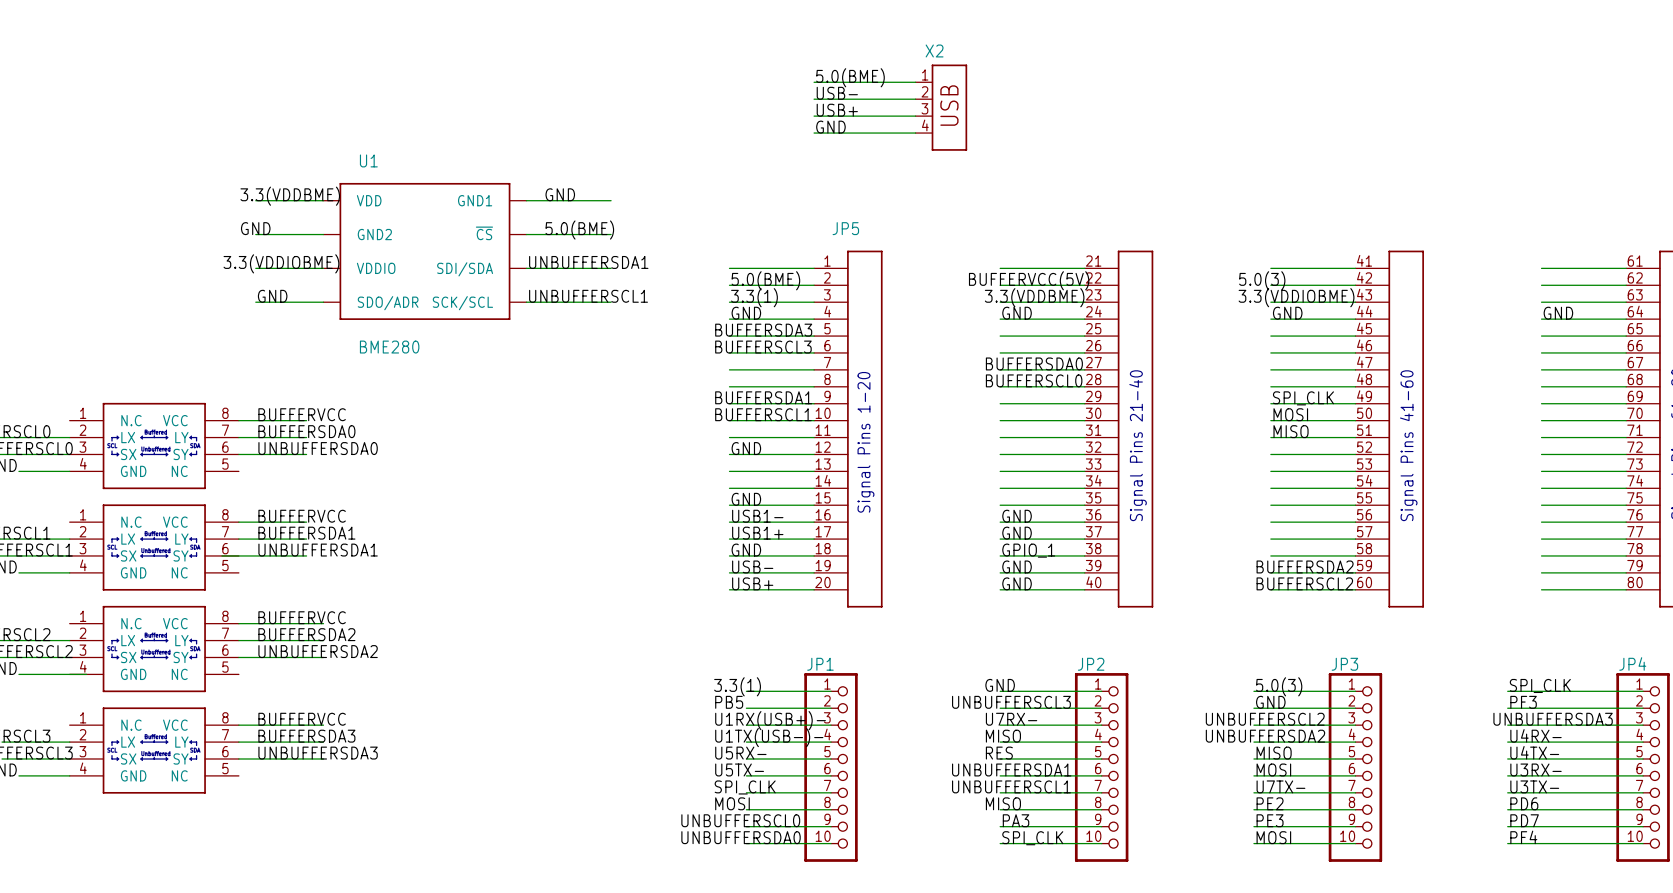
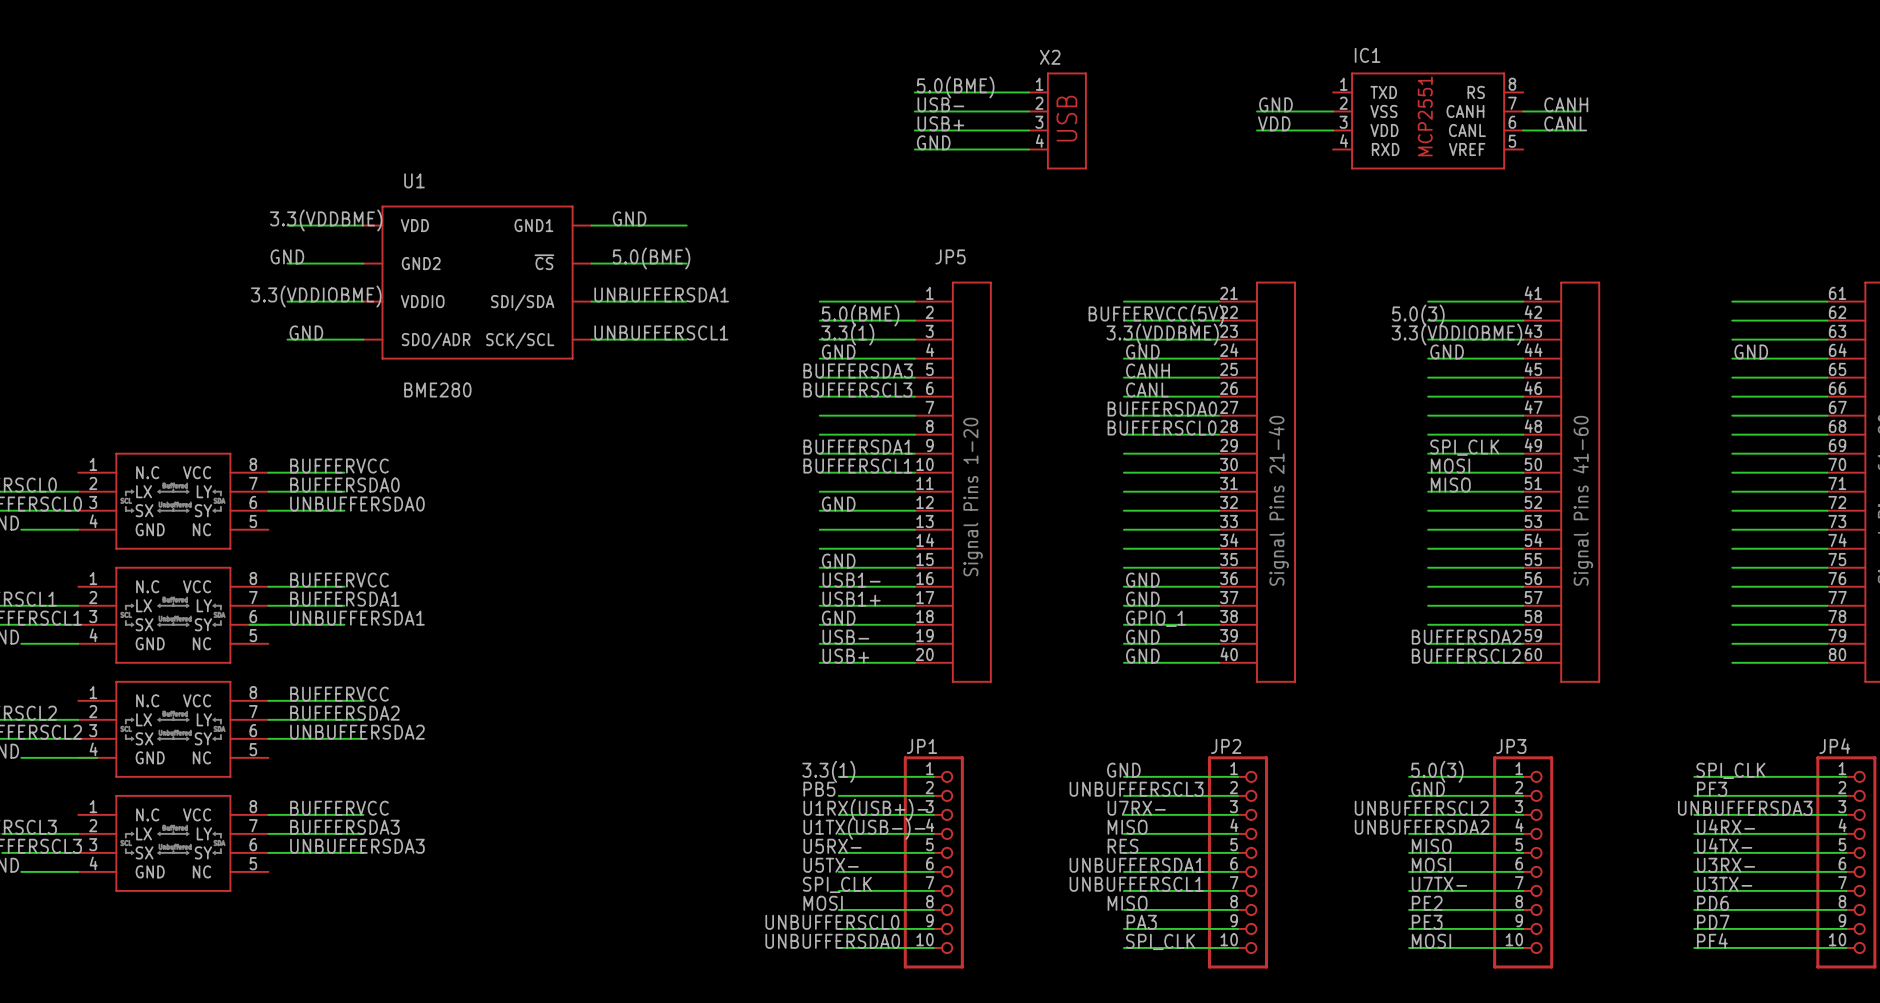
label: none -> GND (1275, 104)
label: none -> CANH (1566, 104)
wire: none -> (1257, 111) (1333, 111)
wire: none -> (1523, 111) (1580, 111)
IC1: none -> (1428, 120)
label: none -> VDD (1274, 123)
label: none -> CANL (1565, 123)
wire: none -> (1257, 130) (1333, 130)
wire: none -> (1523, 130) (1580, 130)
label: none -> CANH (1148, 370)
label: none -> CANL (1147, 389)

